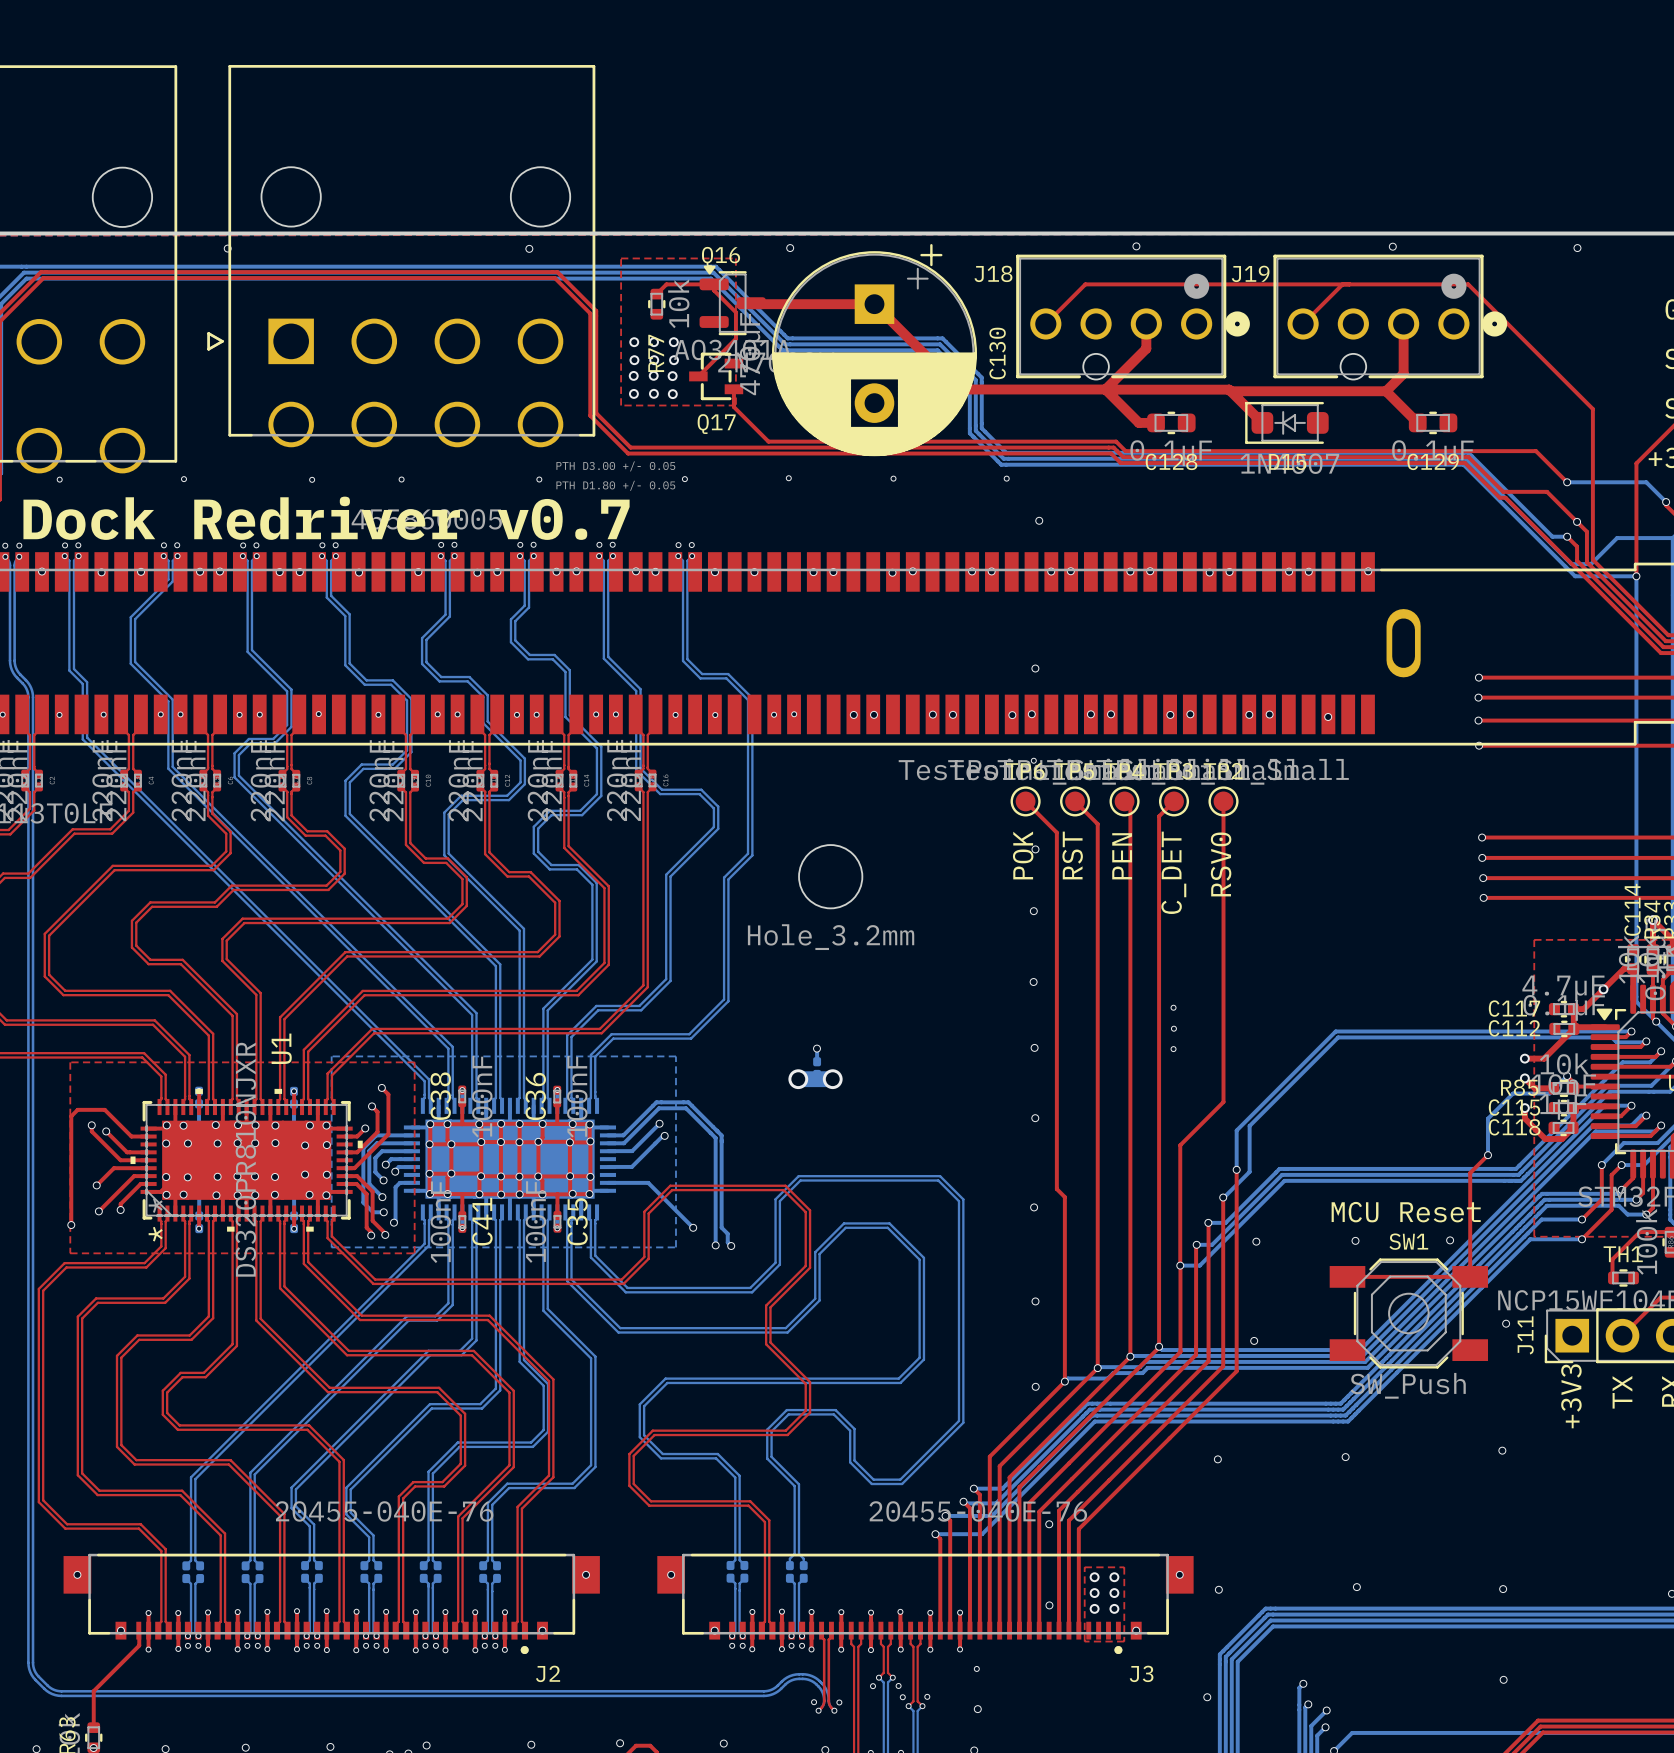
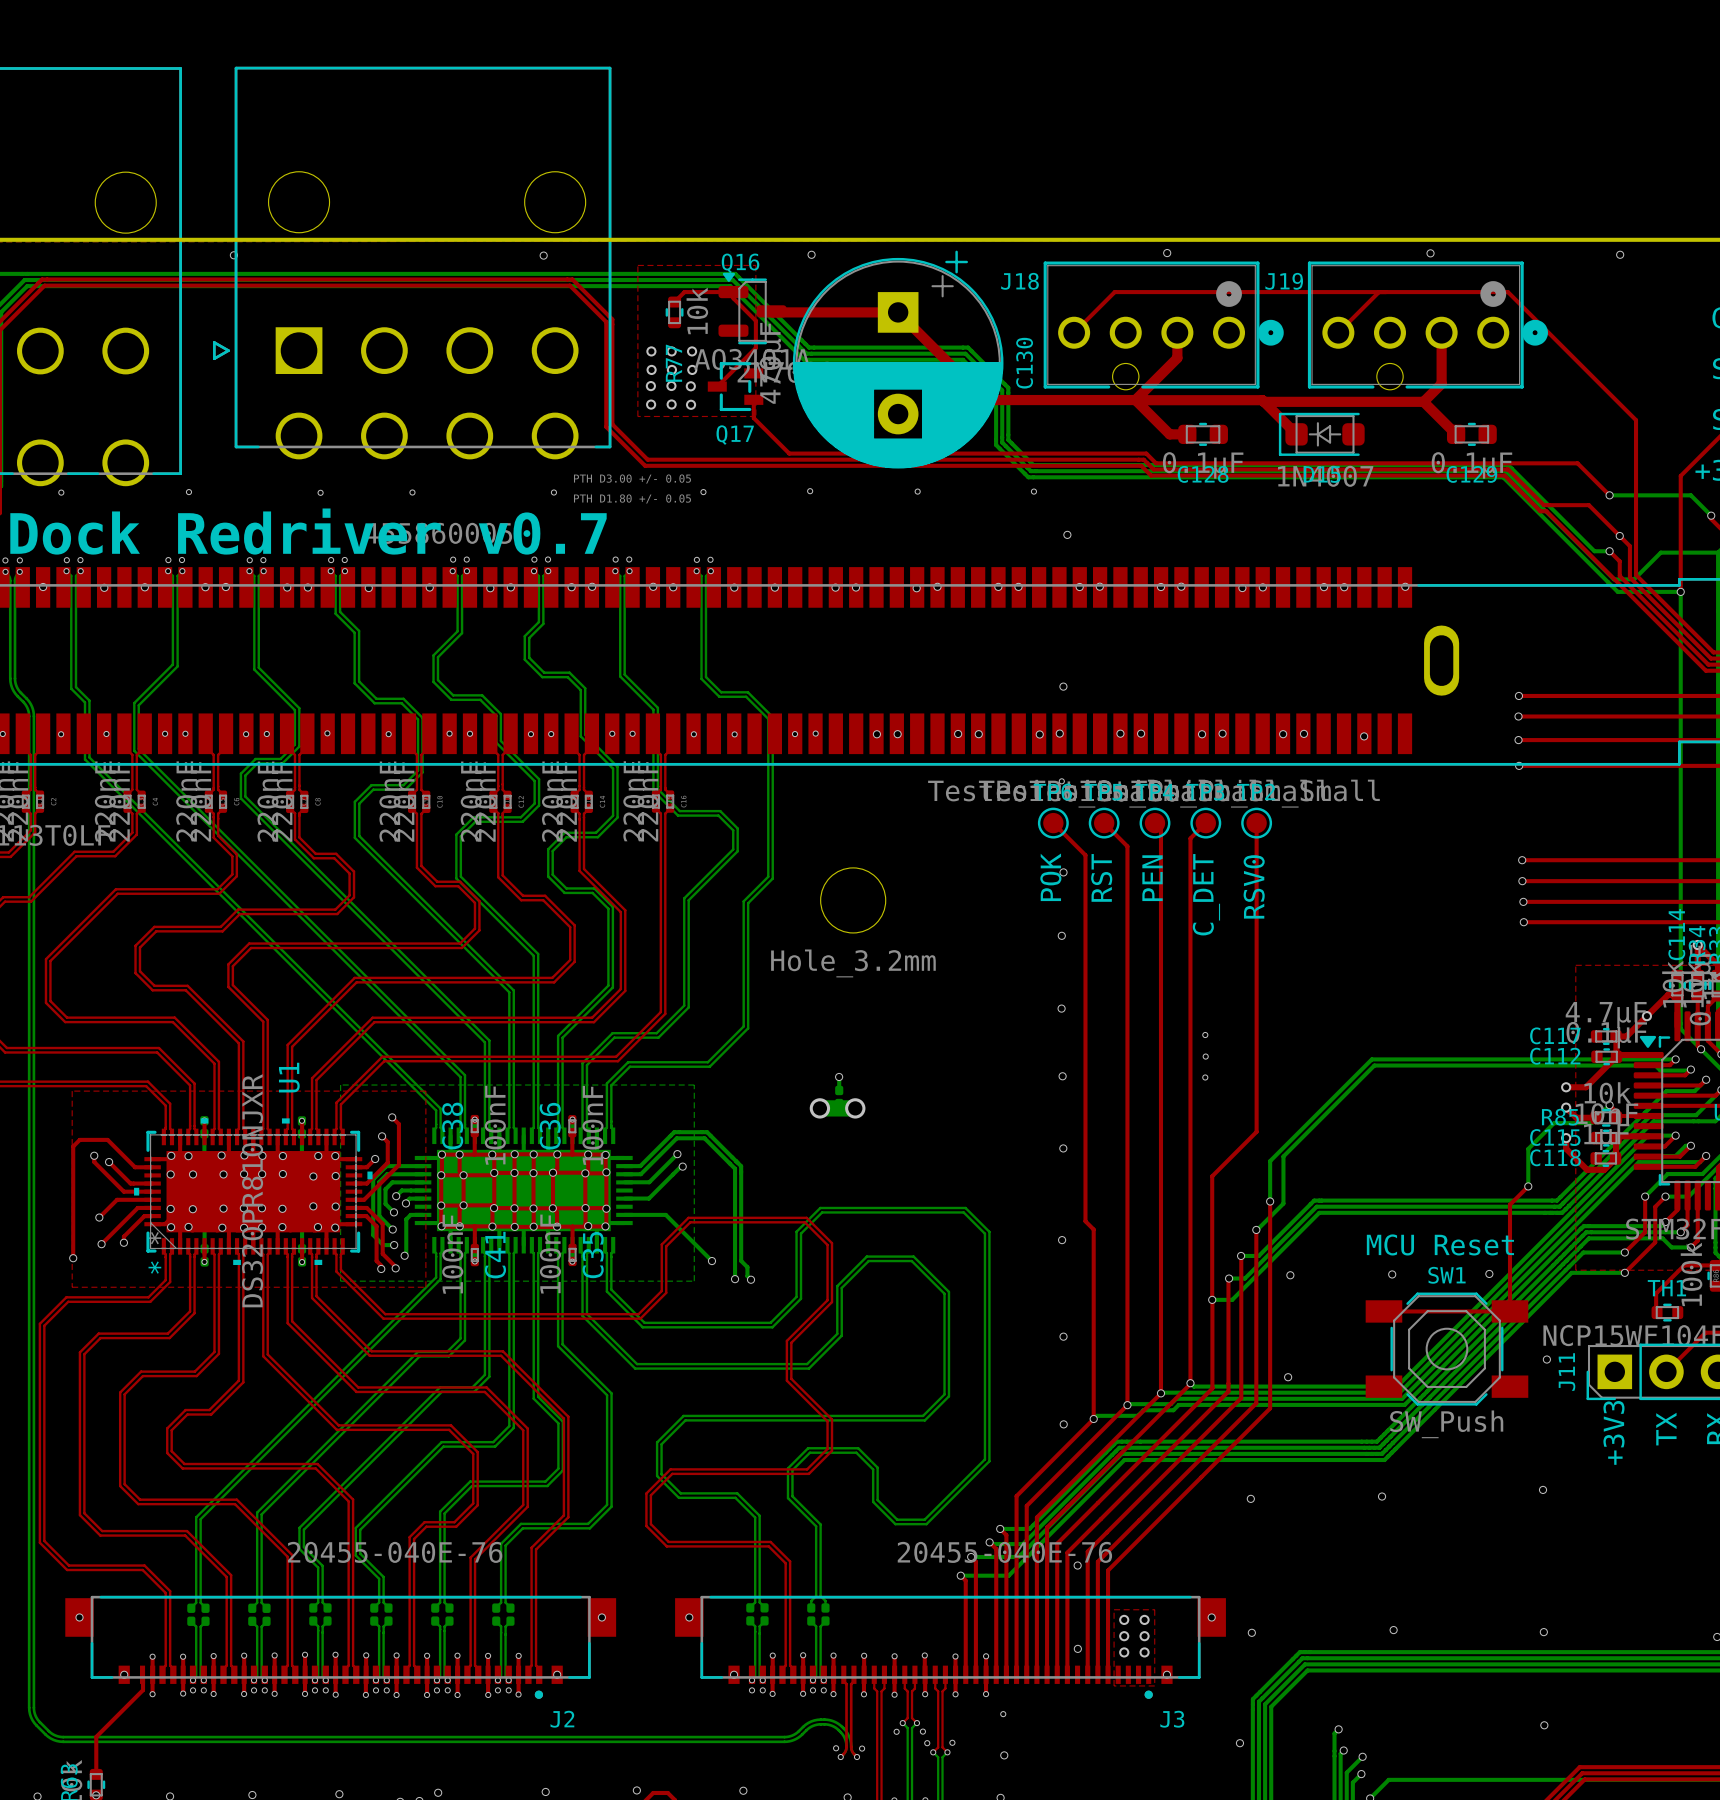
bottom track: (168, 560) (168, 579) (130, 617) (130, 663) (168, 701) (168, 768) -> (172, 575) (172, 664) (134, 703) (134, 750) (172, 789)
bottom track: (172, 560) (172, 581) (135, 619) (135, 661) (172, 699) (172, 766) -> (177, 575) (177, 666) (138, 705) (138, 749) (177, 787)

